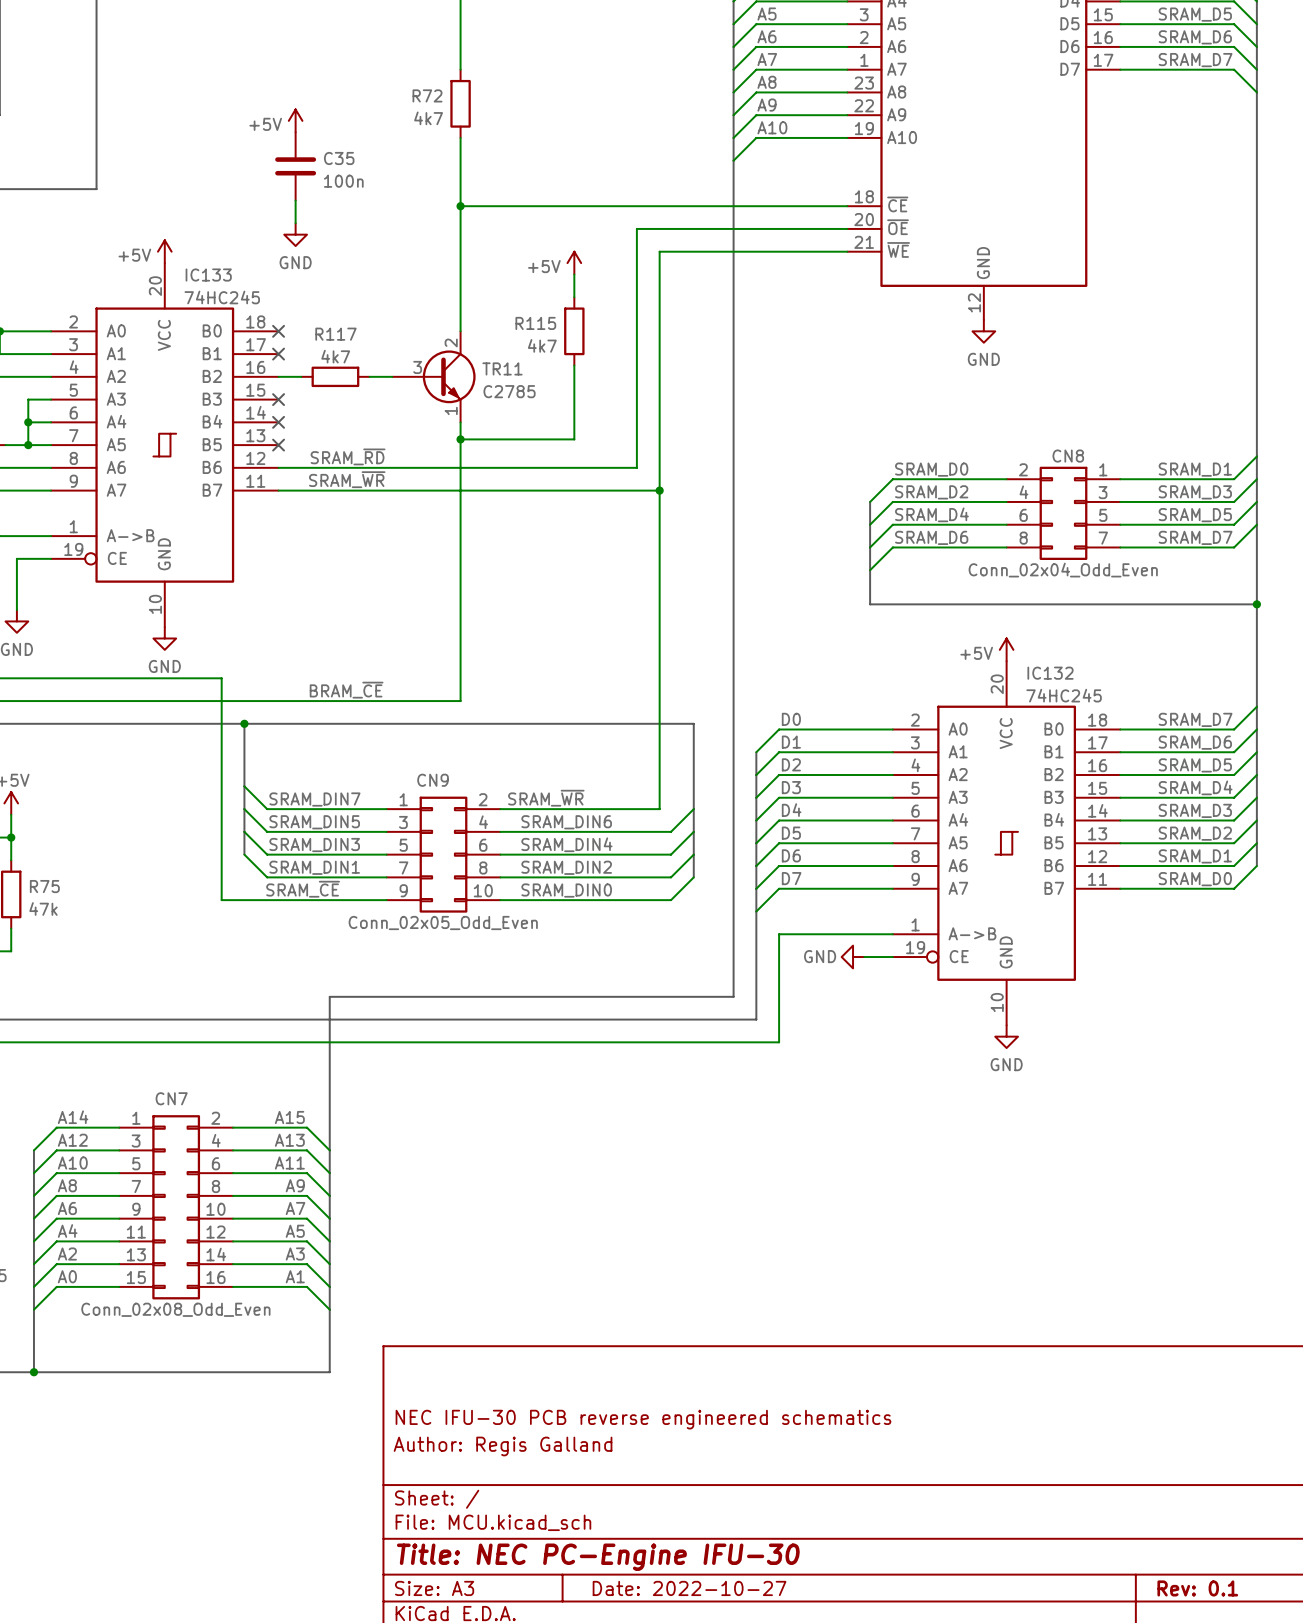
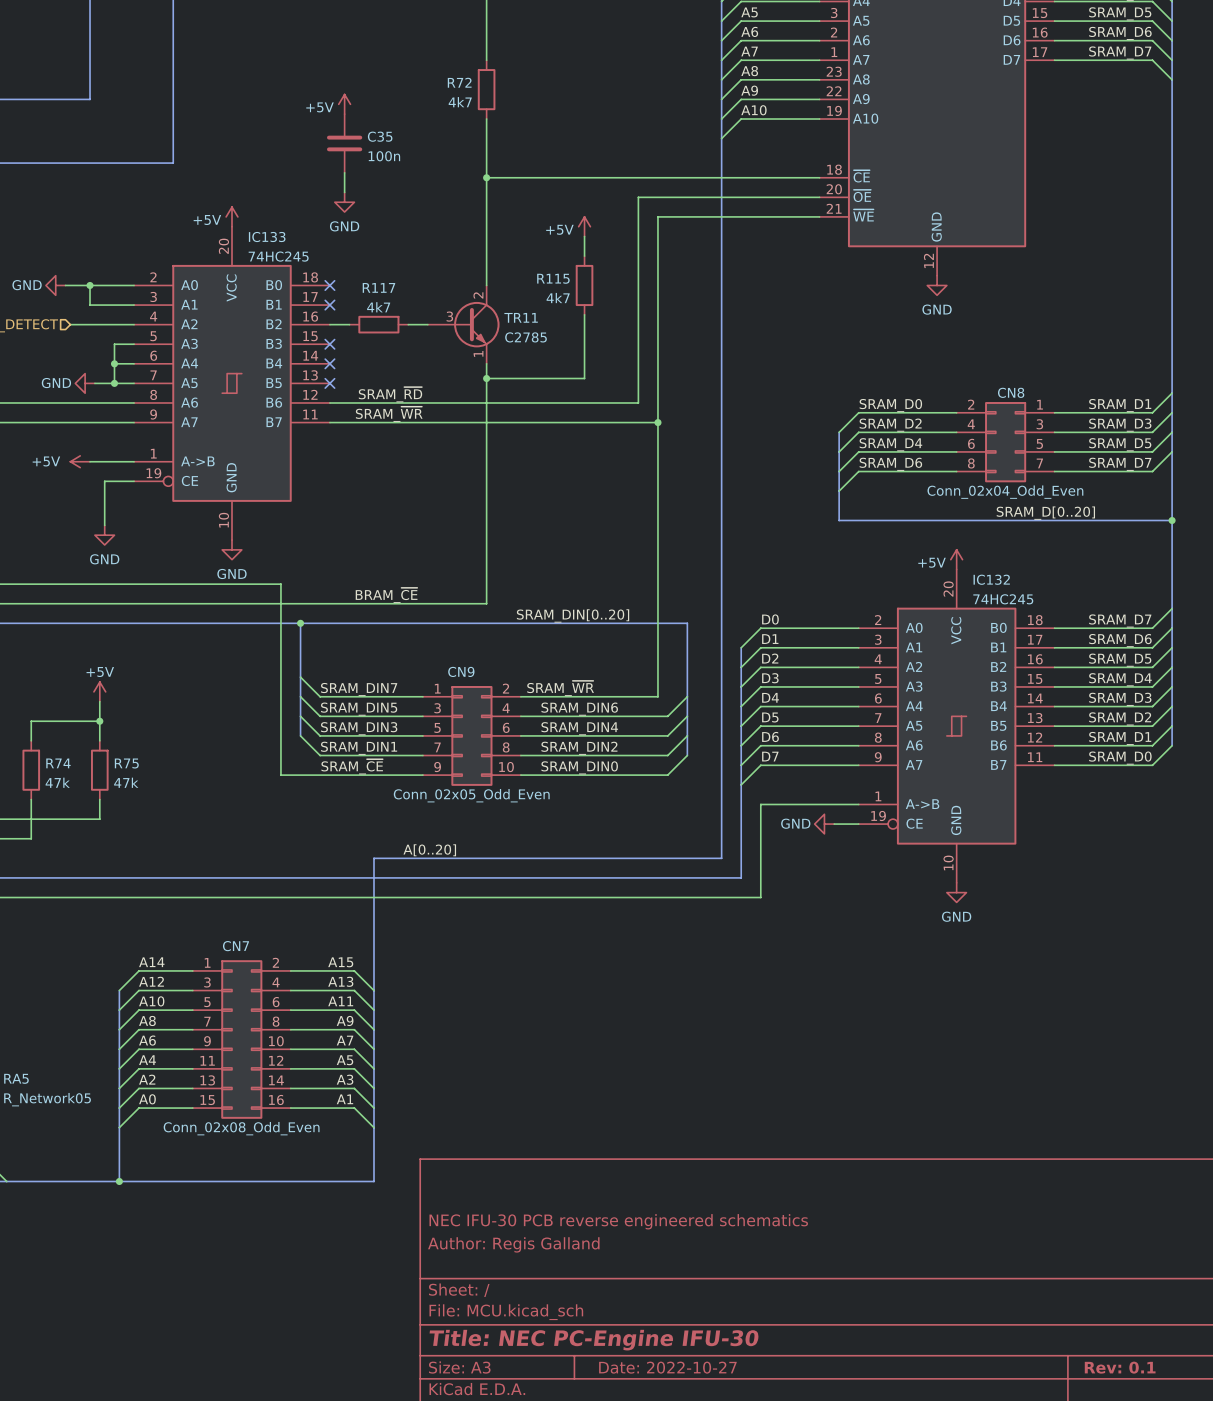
label: none -> SRAM_D[0..20] (1045, 513)
label: none -> SRAM_DIN[0..20] (573, 615)
label: none -> A[0..20] (429, 850)

